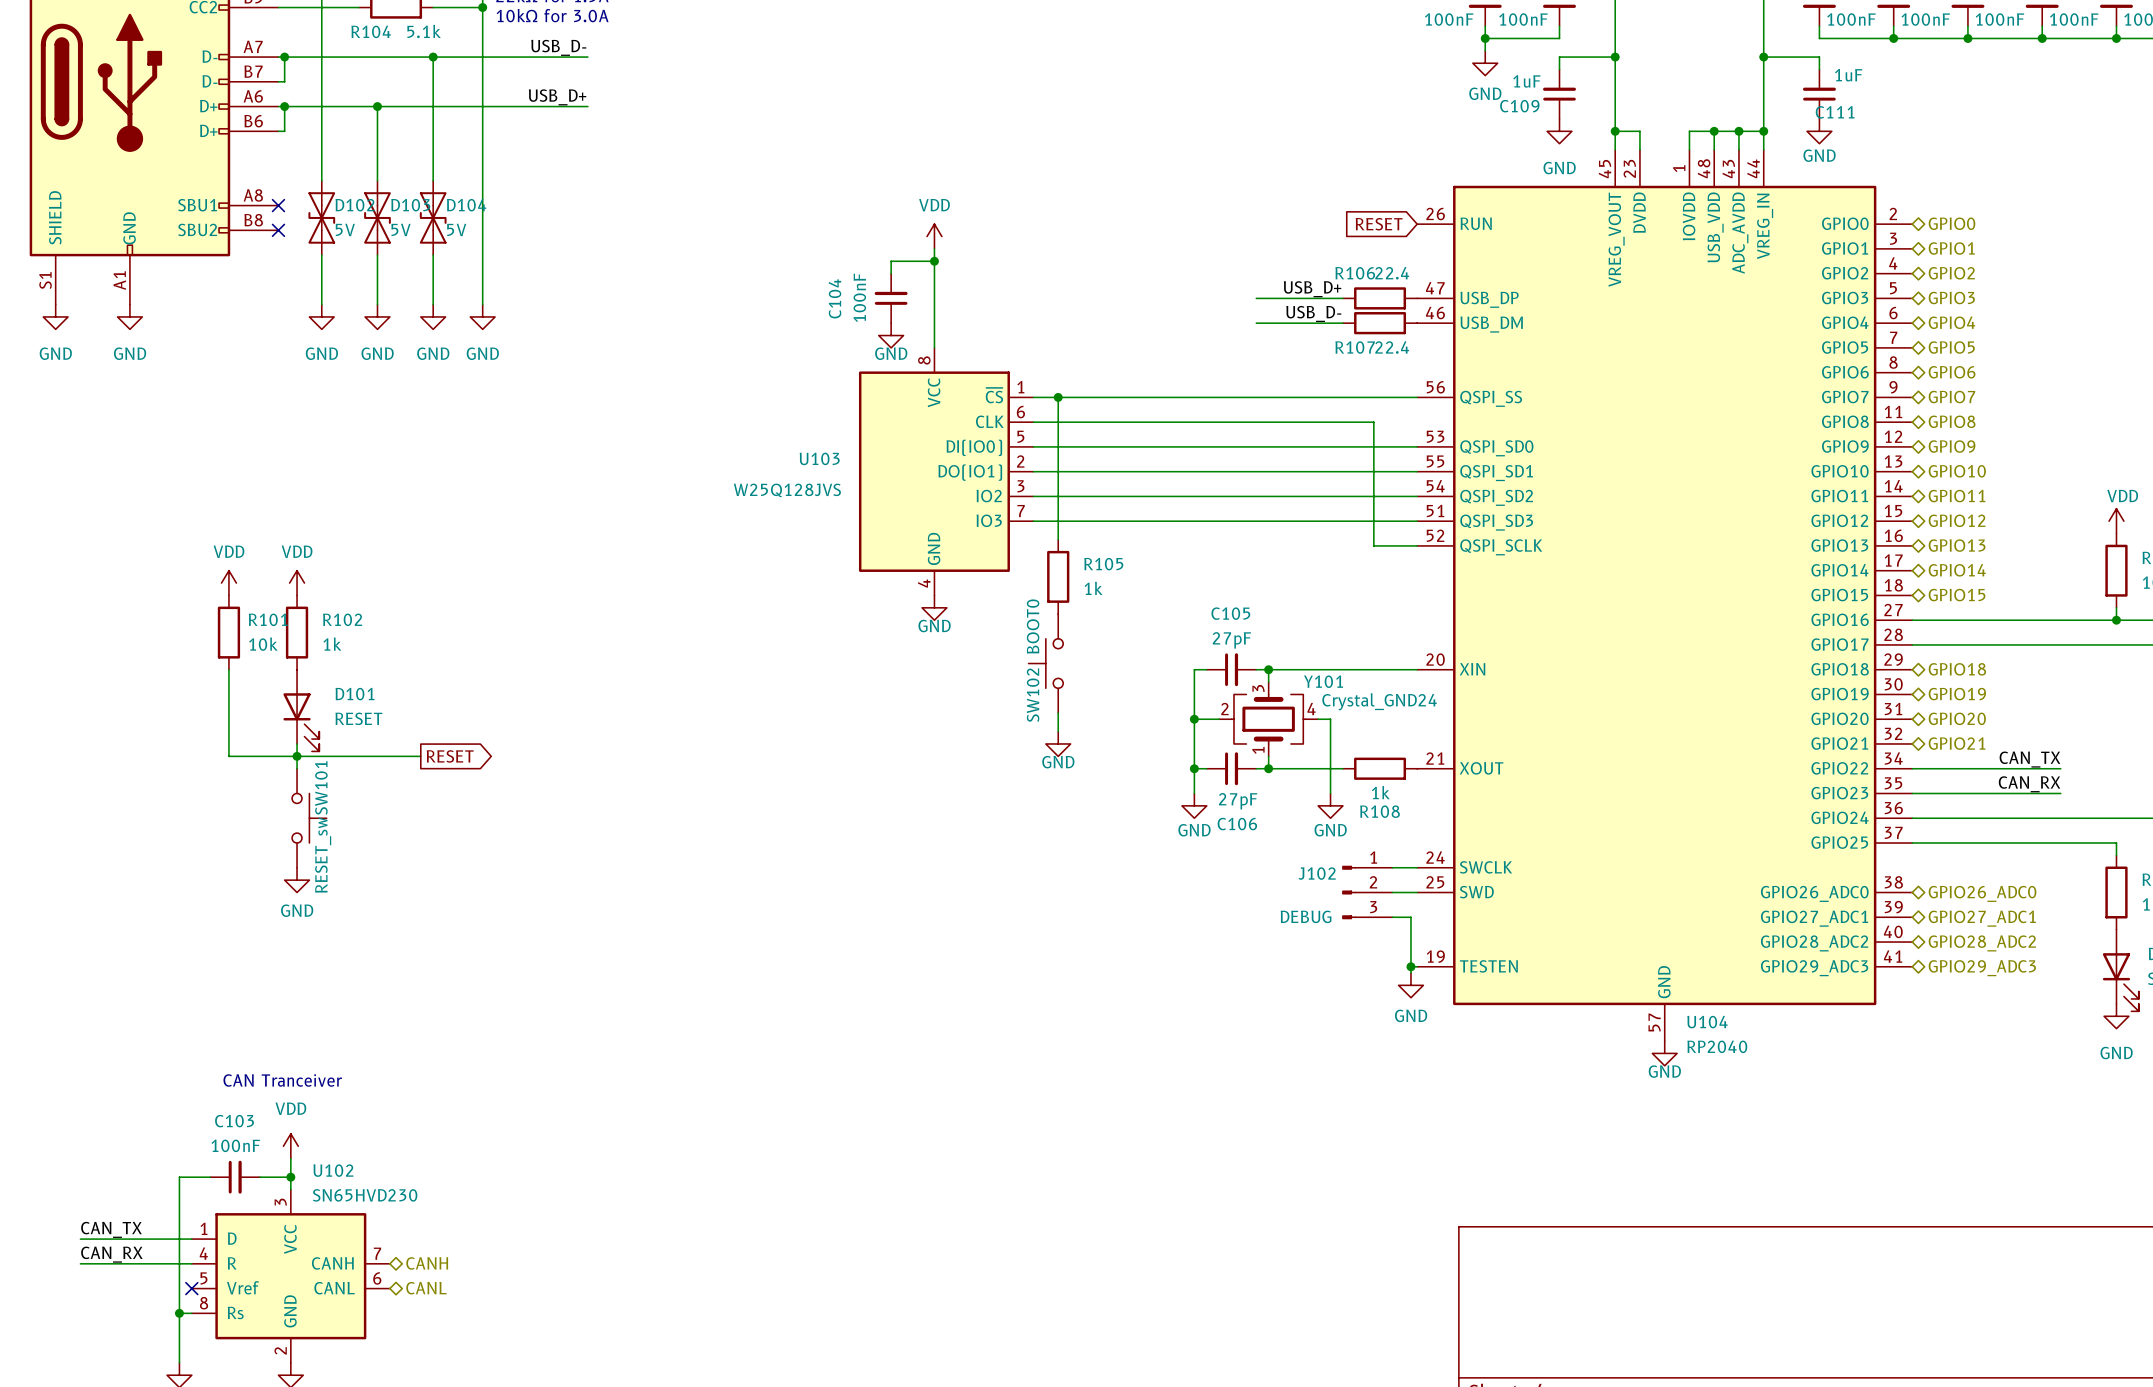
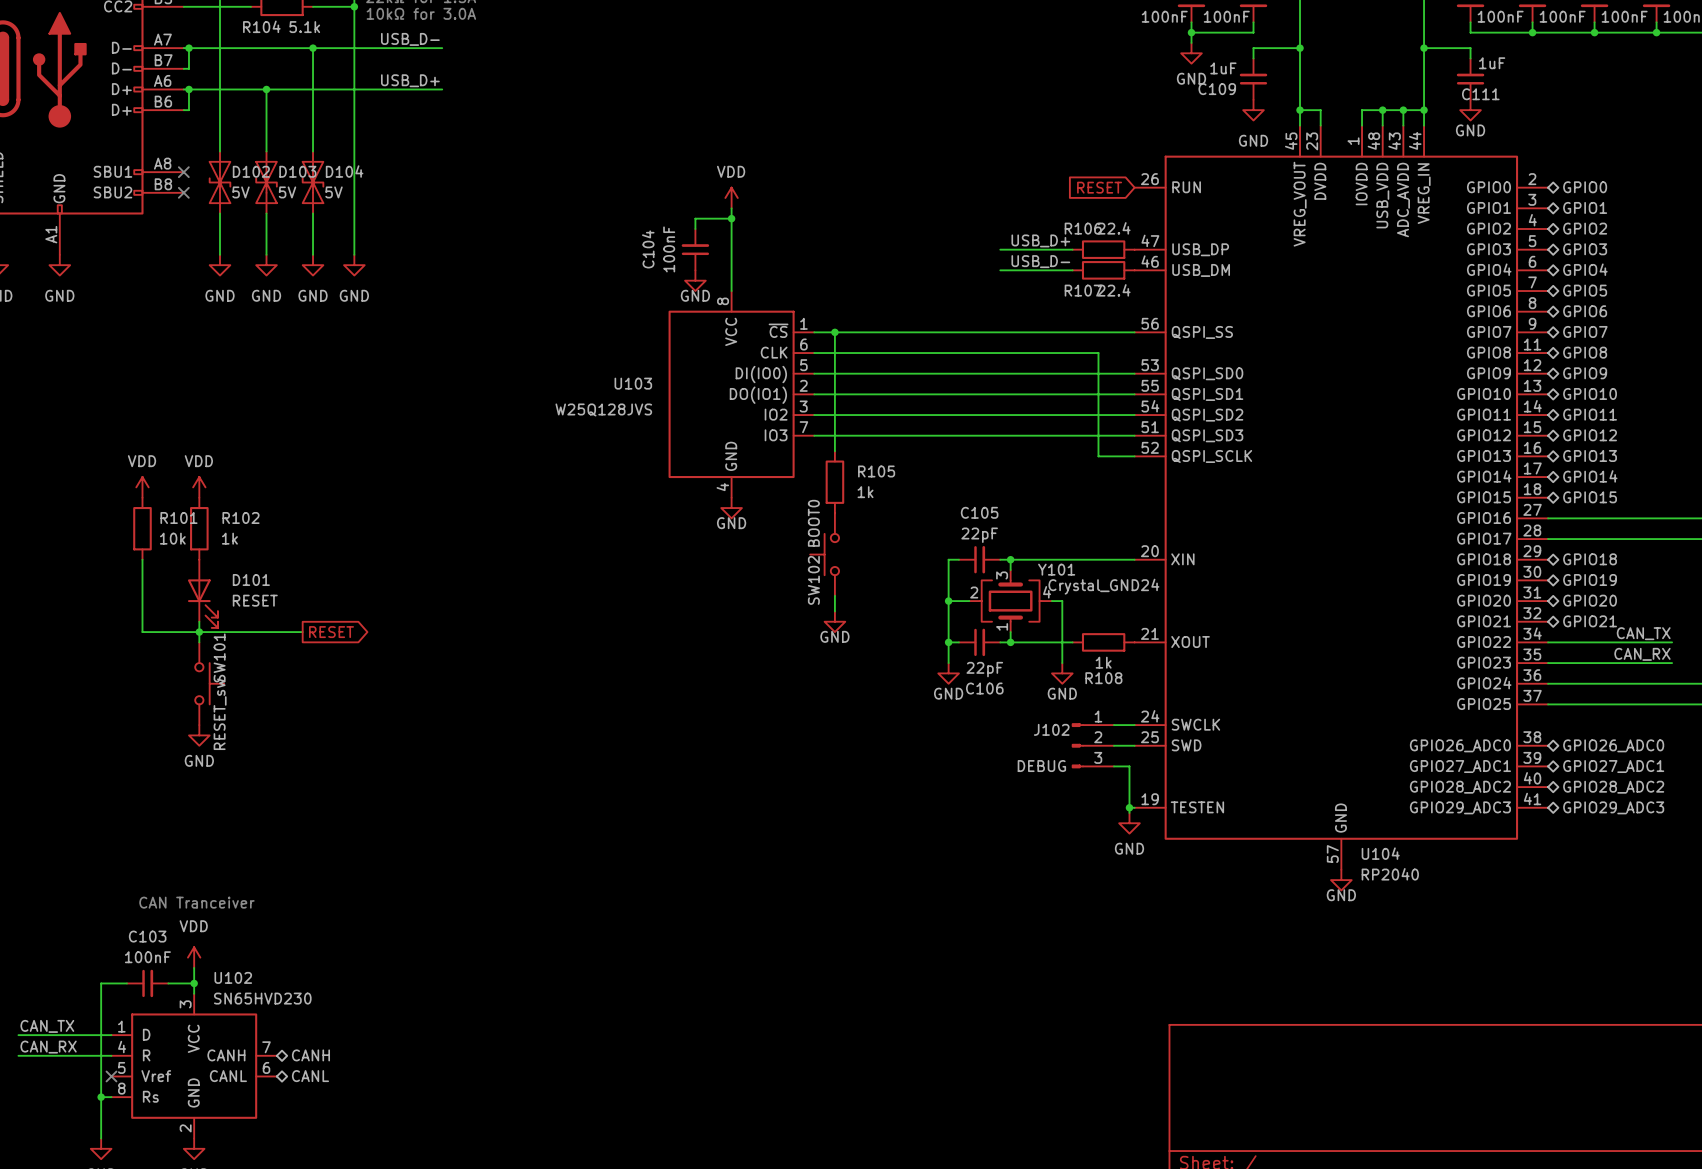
C105 value: 27pF (1231, 640) -> 22pF (979, 535)
C106 value: 27pF (1238, 801) -> 22pF (984, 669)

